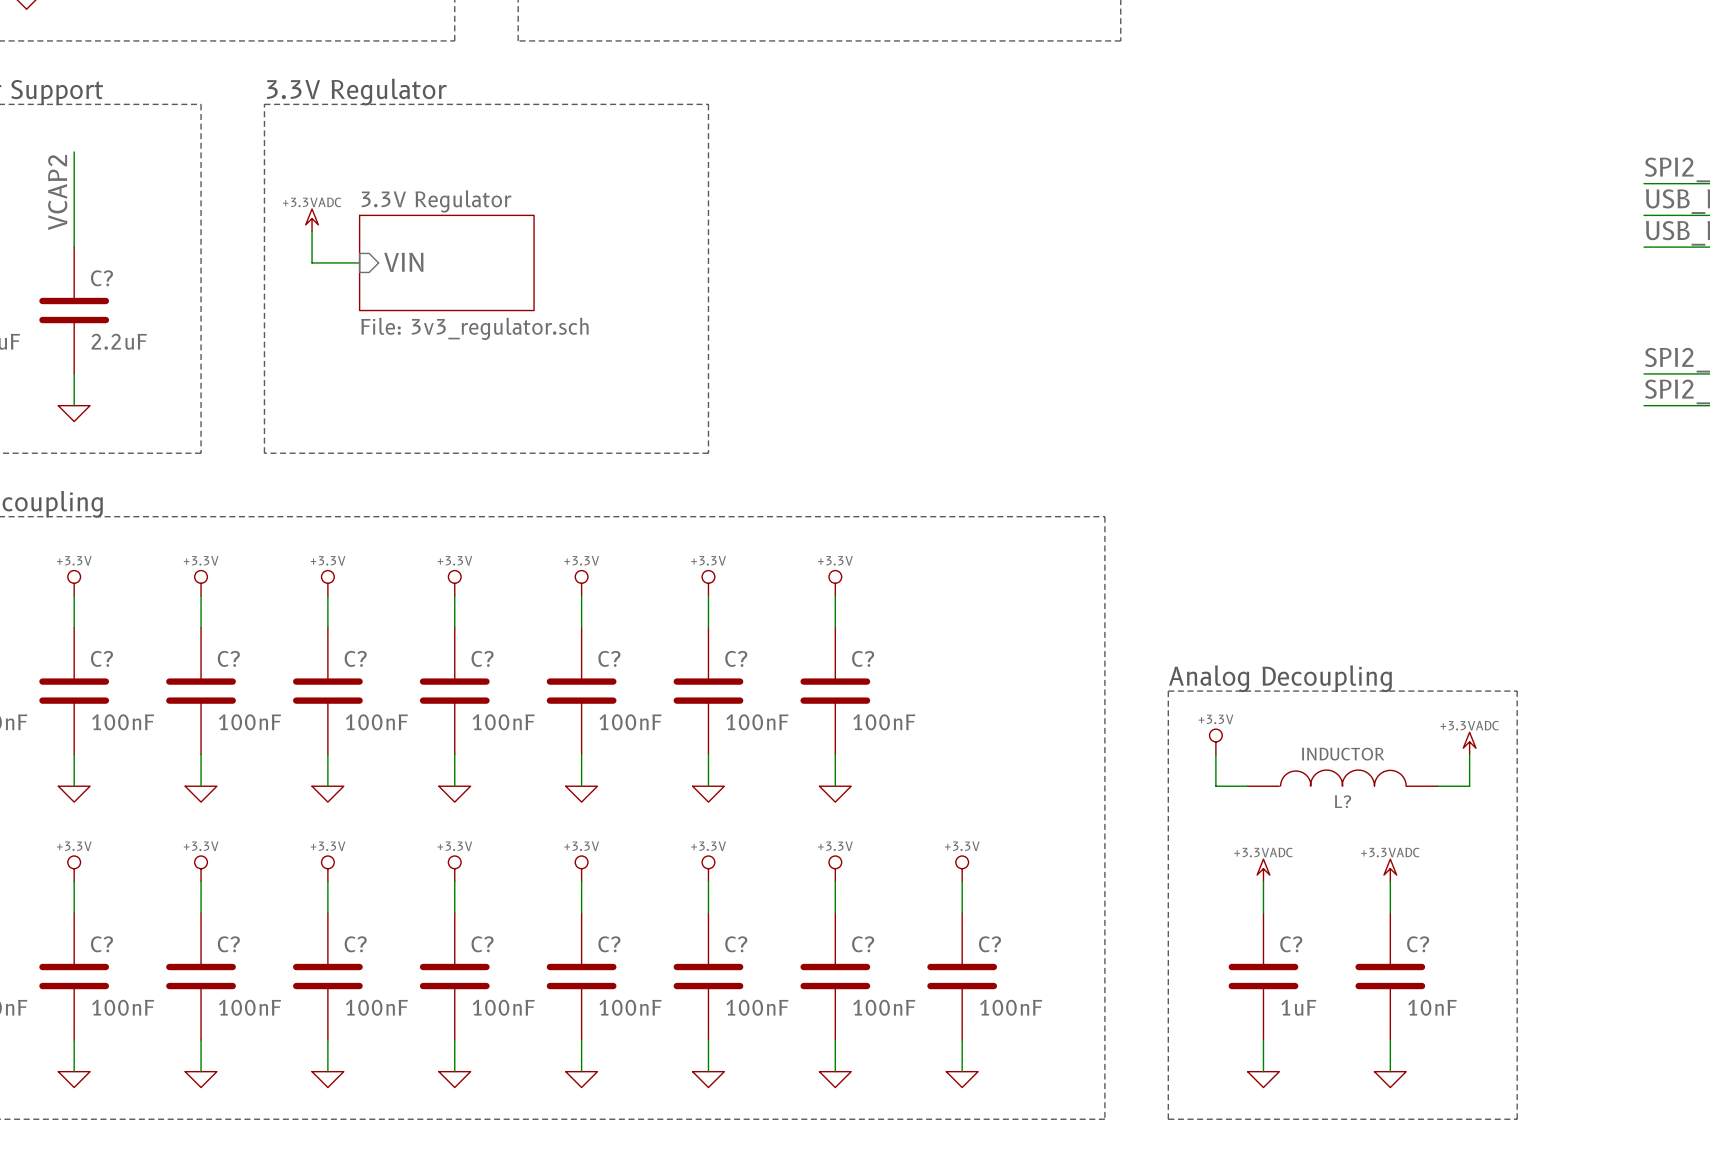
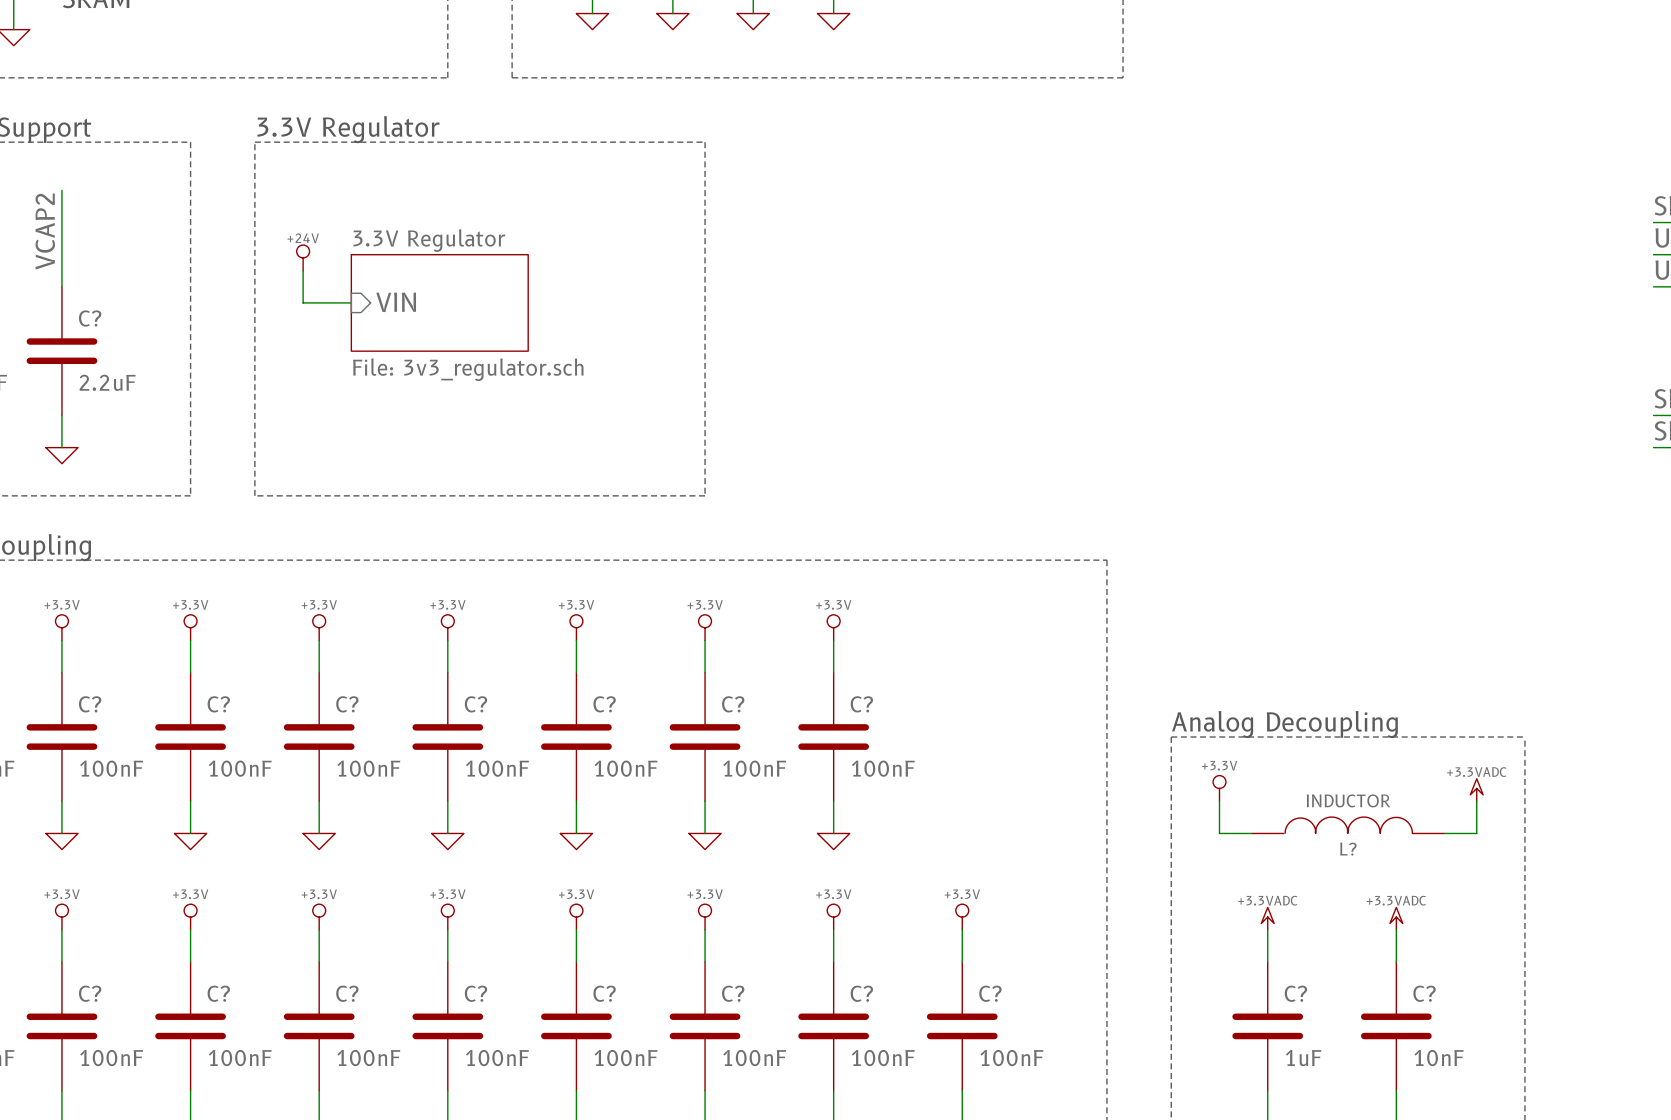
power symbol: +3.3VADC (312, 220) -> +24V (303, 257)

